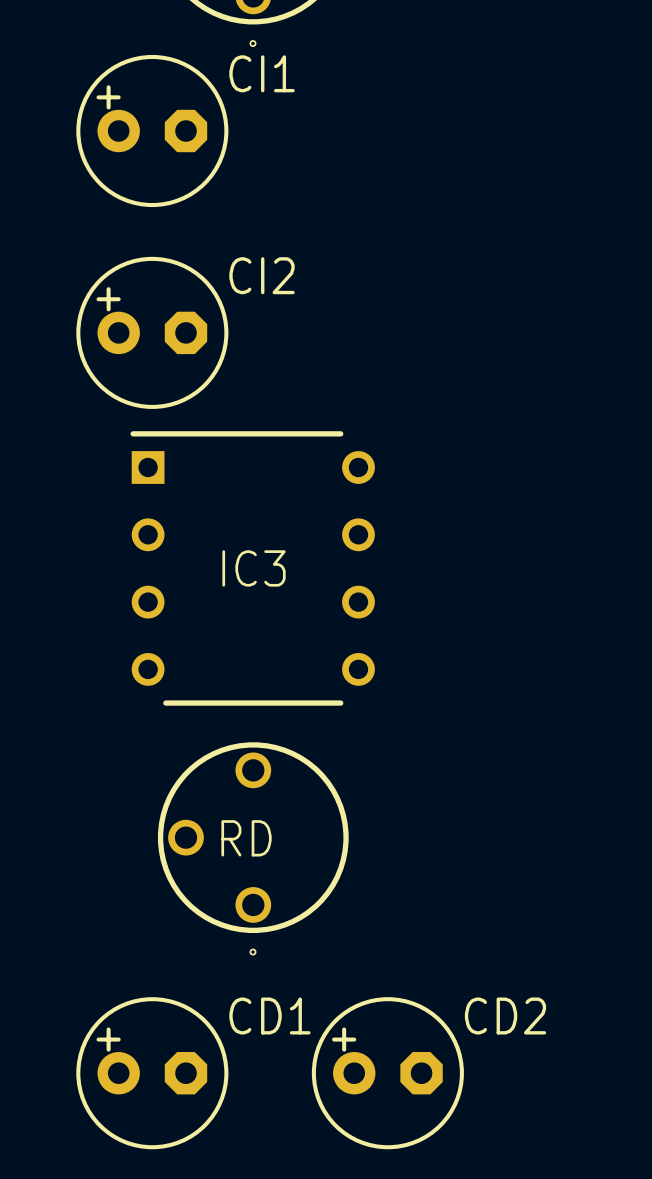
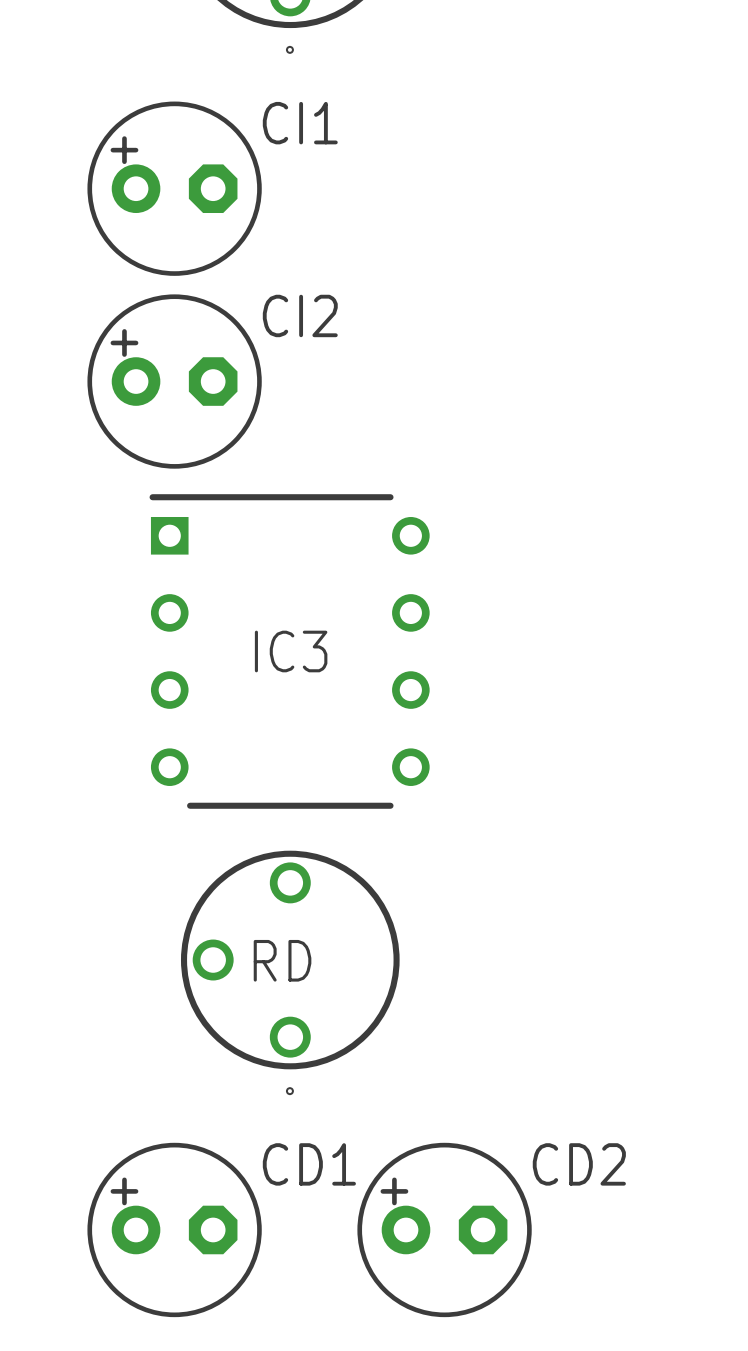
CI1 position: (152, 131) -> (174, 188)

